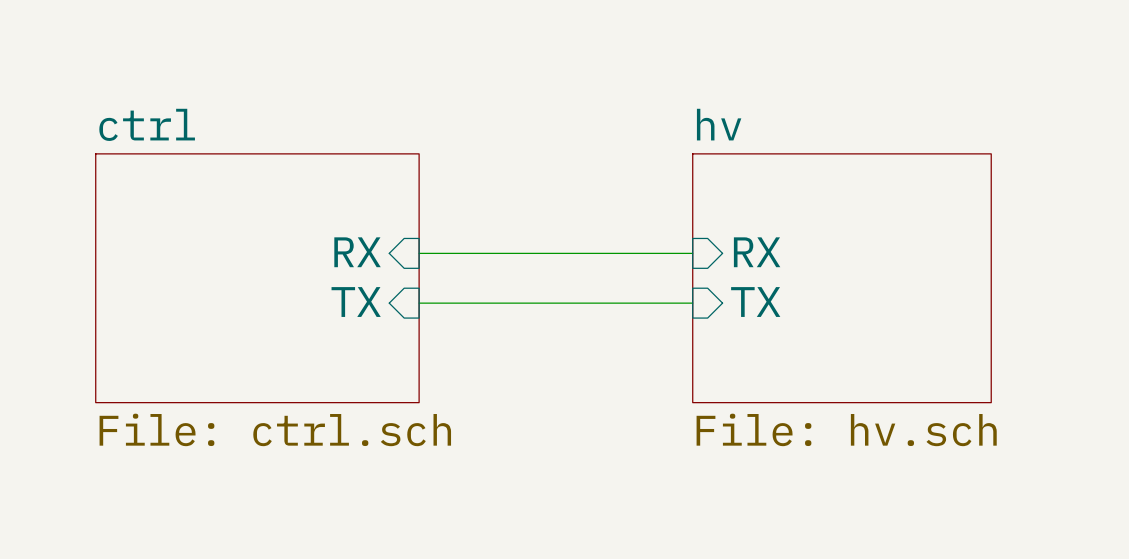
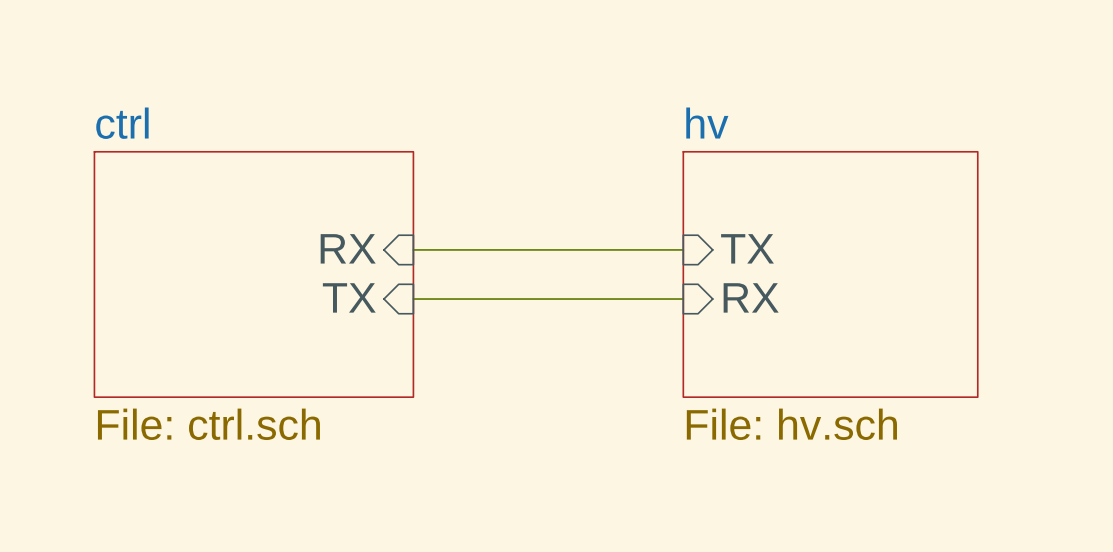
sheet pin: RX (757, 252) -> TX (747, 248)
sheet pin: TX (755, 302) -> RX (751, 297)

